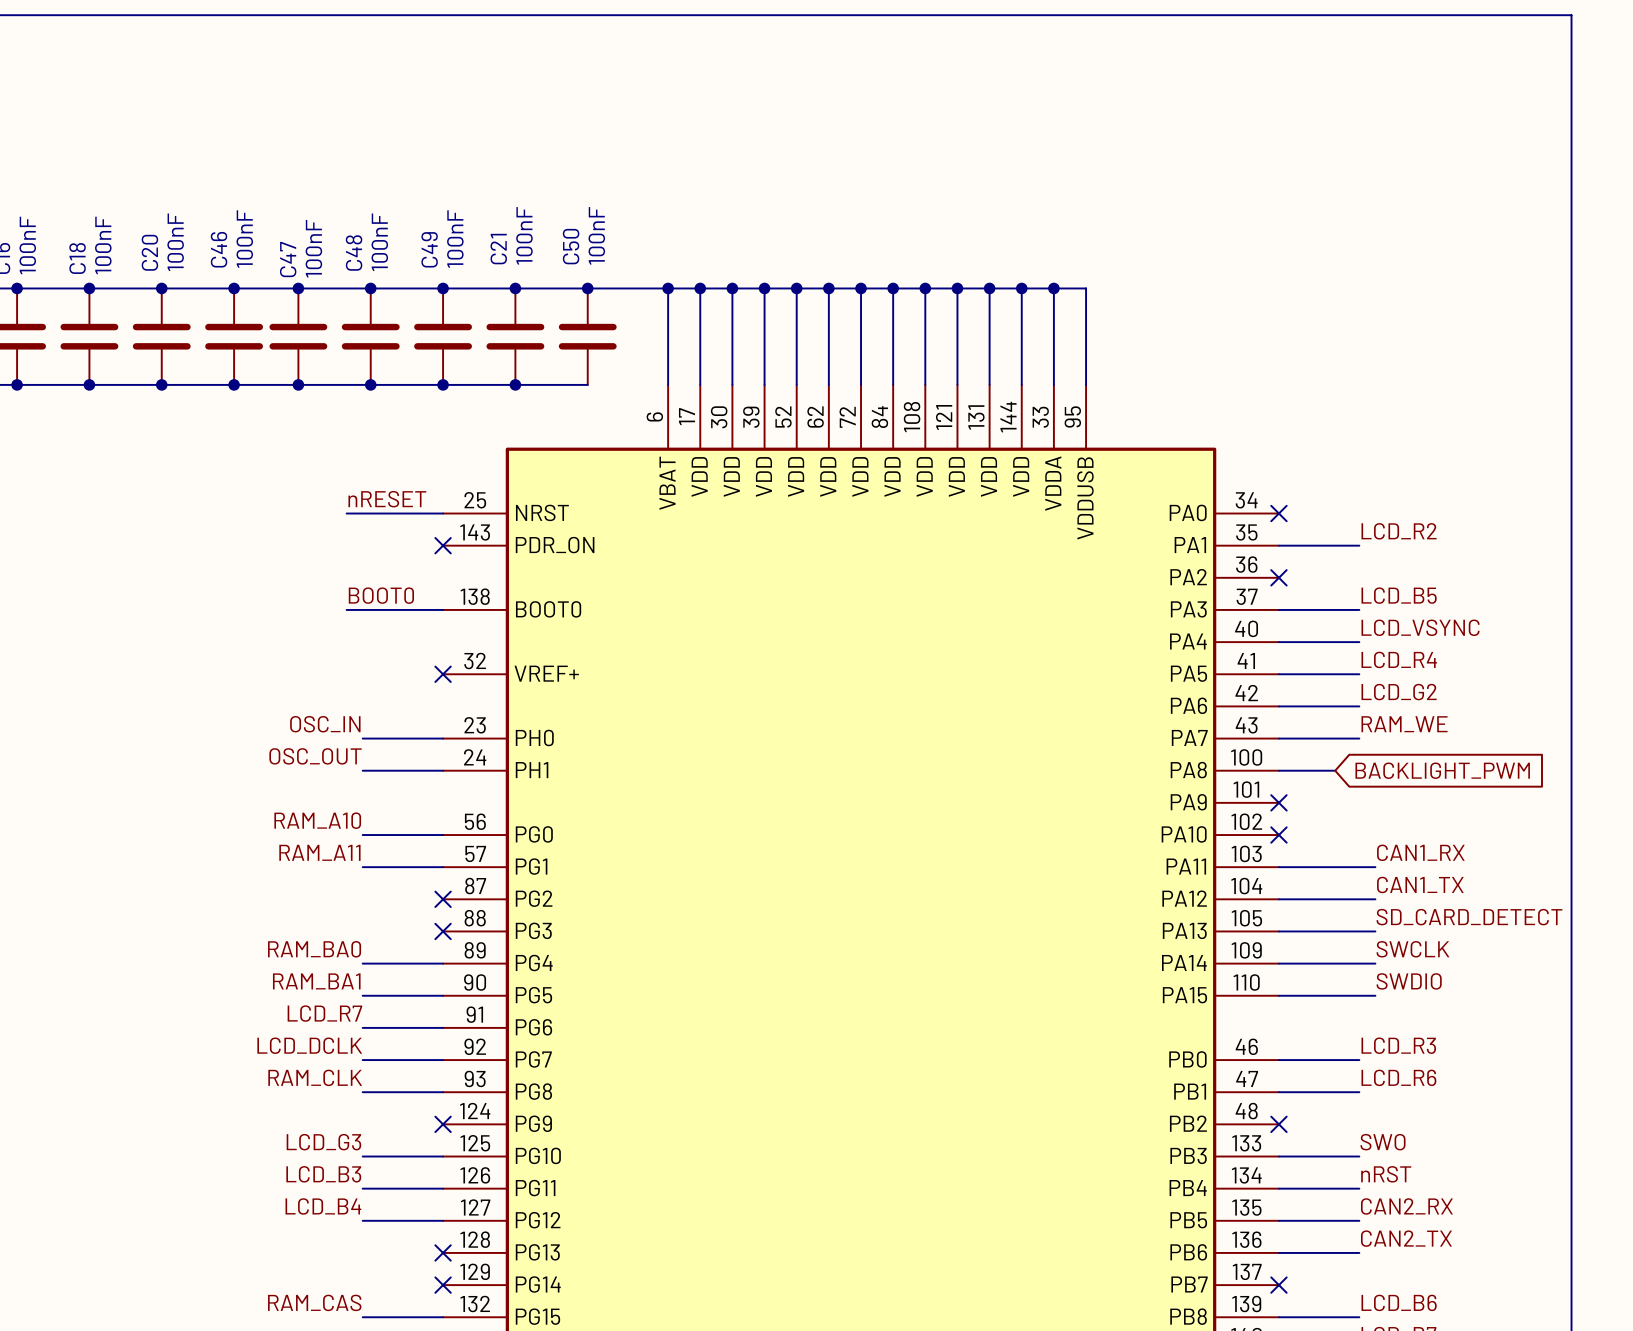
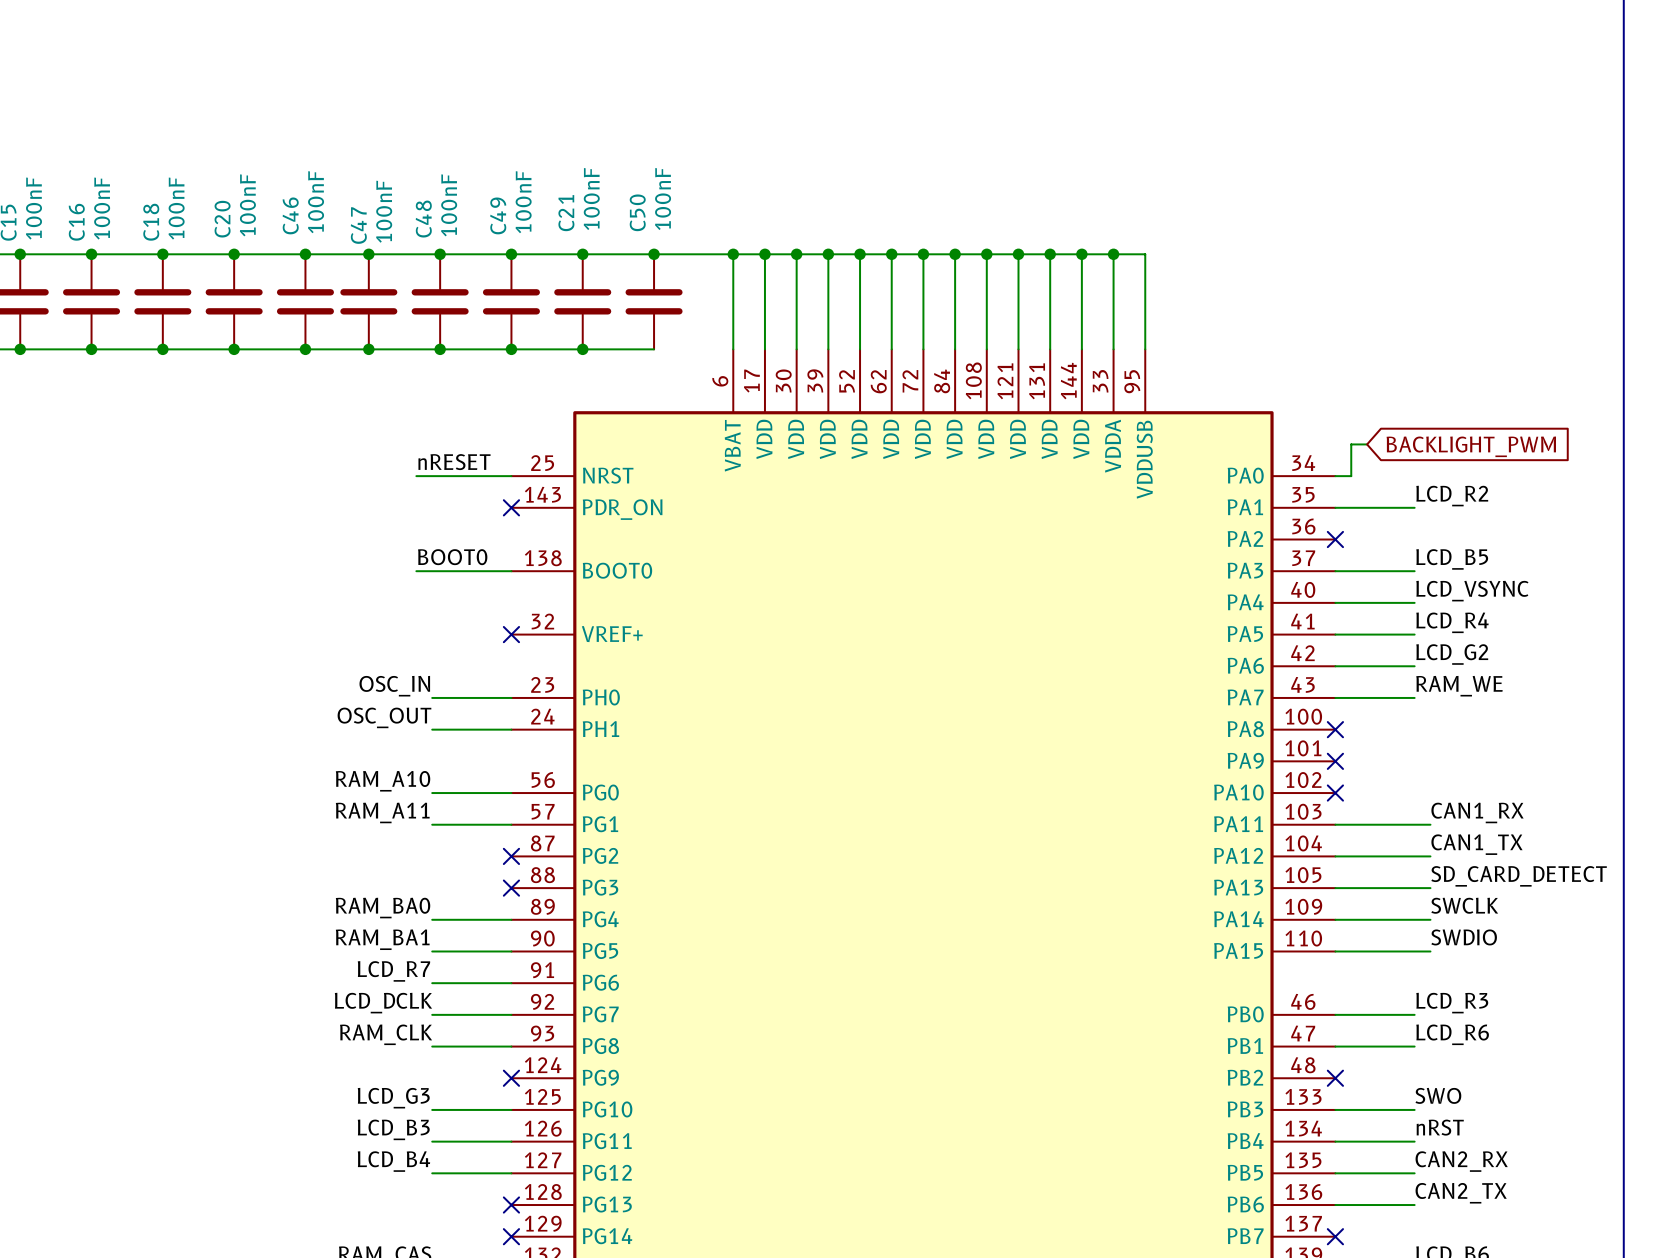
wire: none -> (1367, 444) (1351, 444) (1351, 476) (1335, 476)
no-connect mark: (1278, 513) -> none
wire: (1278, 770) (1335, 770) -> none
no-connect mark: none -> (1335, 729)
global label position: BACKLIGHT_PWM (1442, 770) -> BACKLIGHT_PWM (1471, 446)

